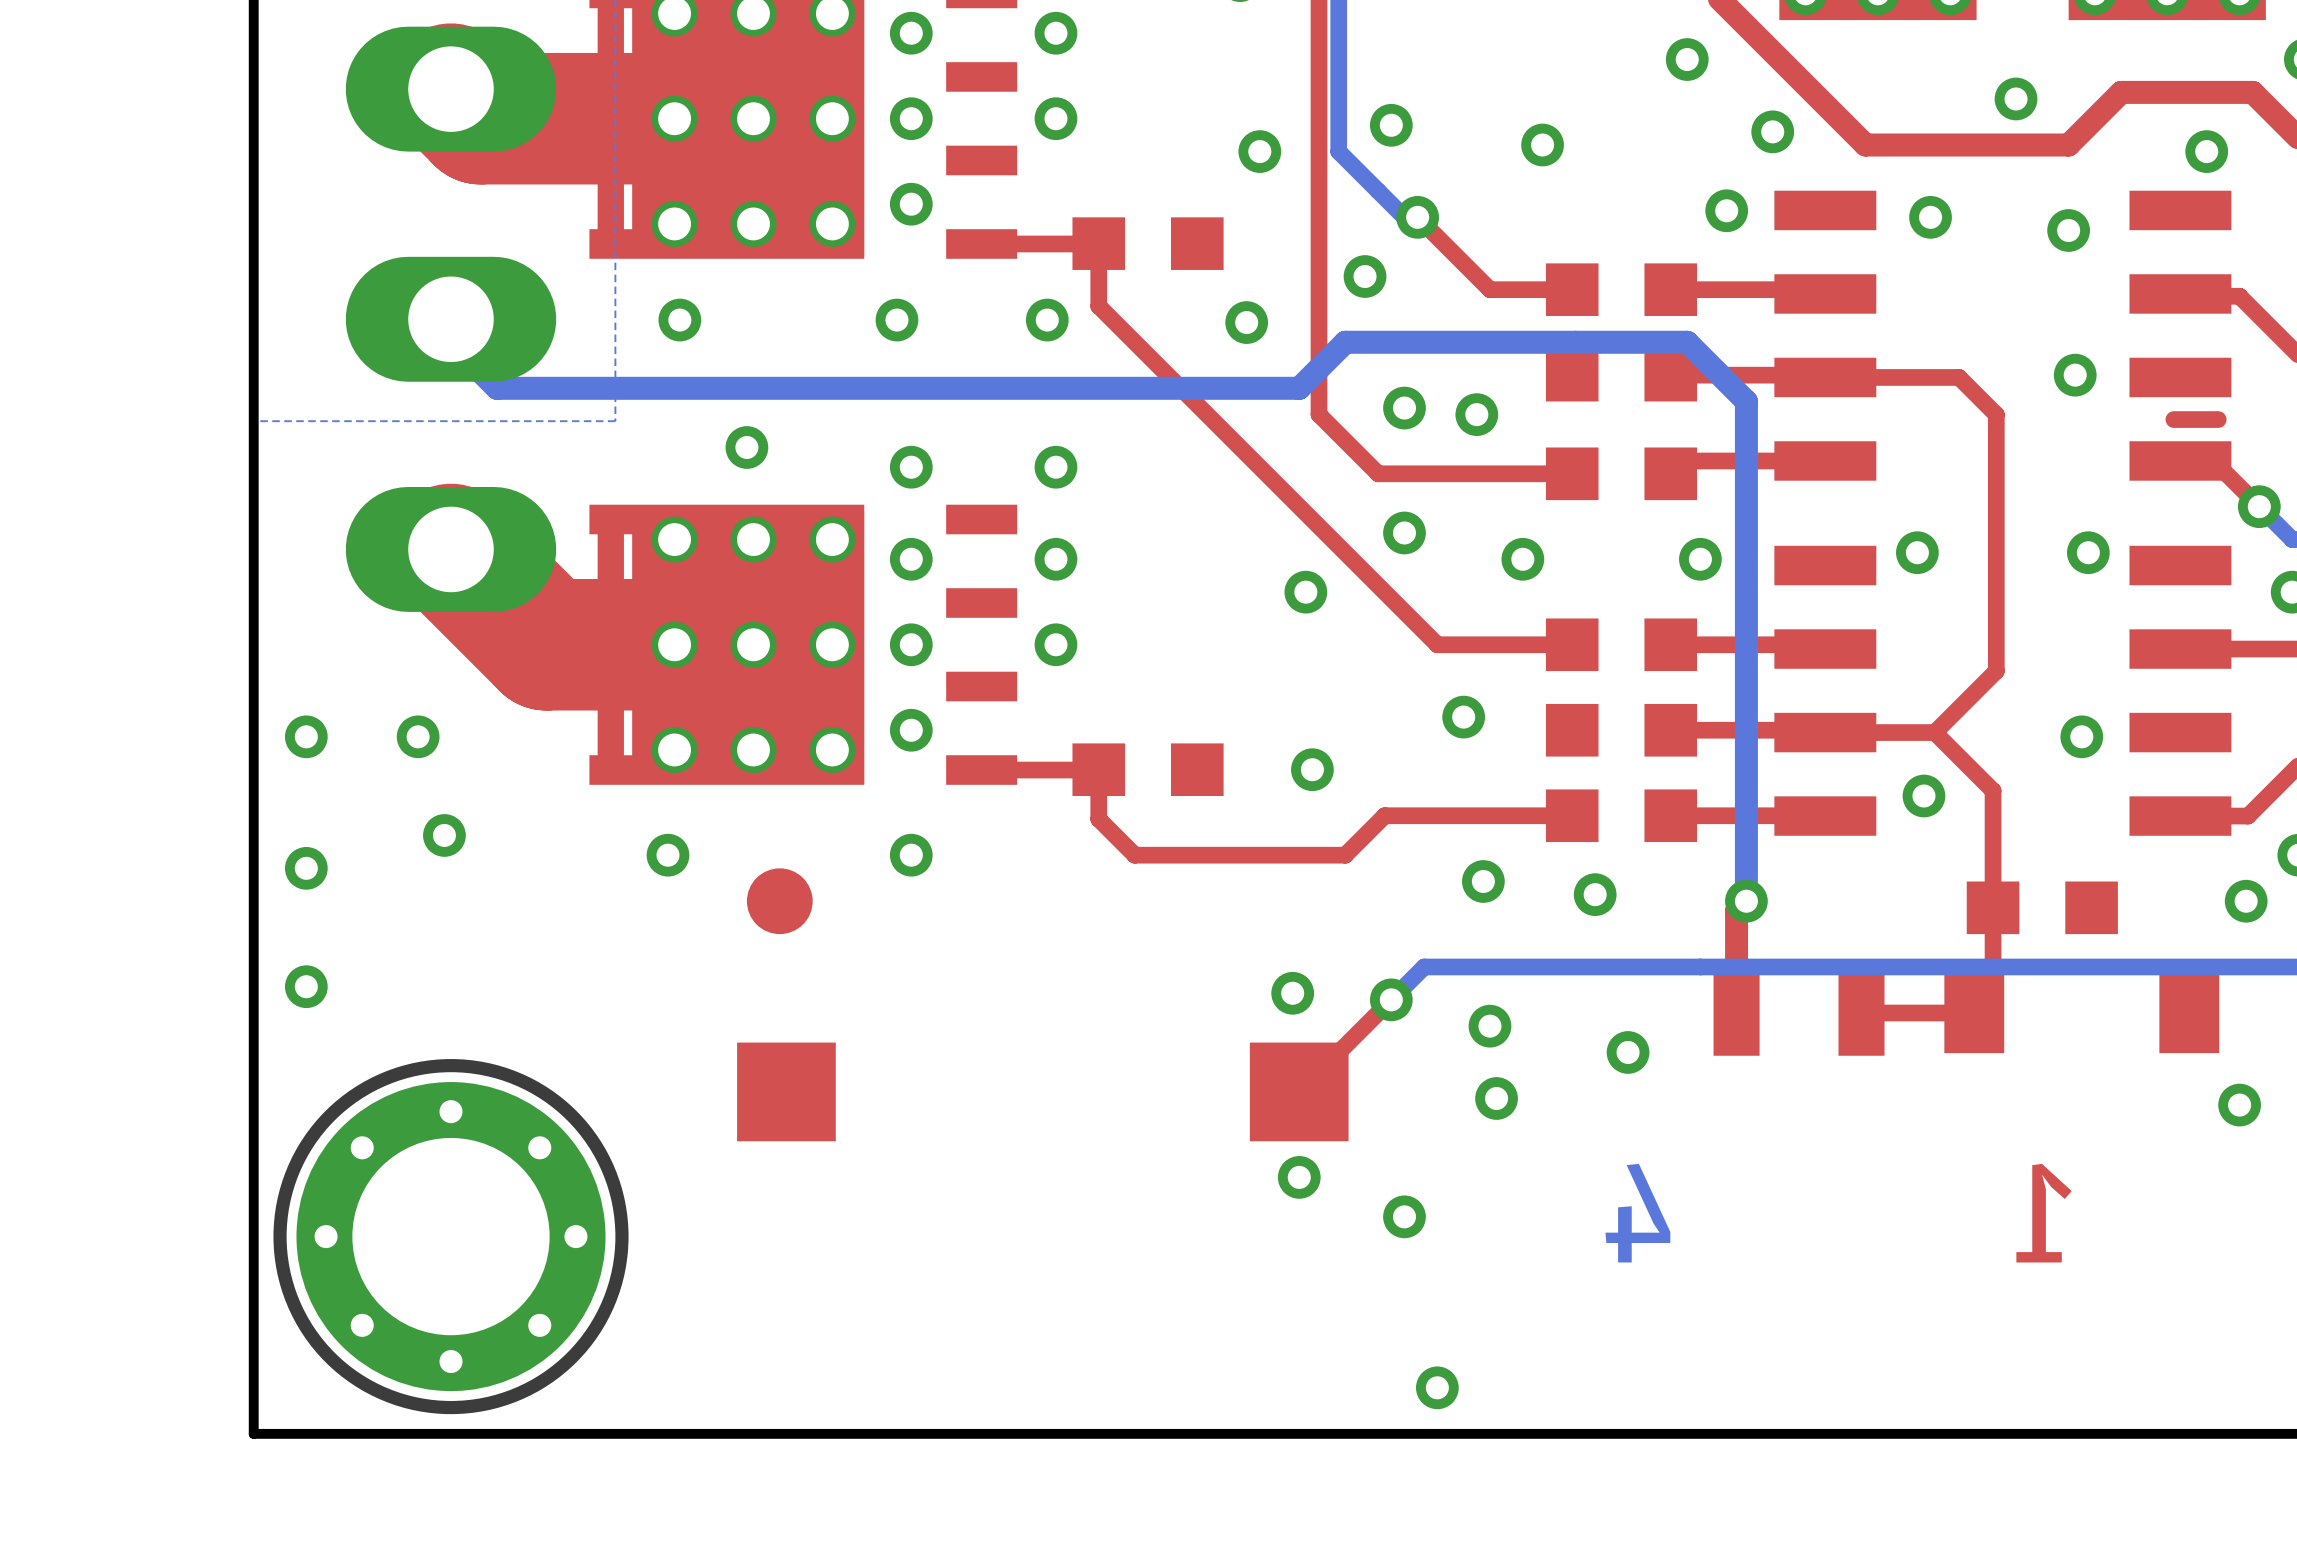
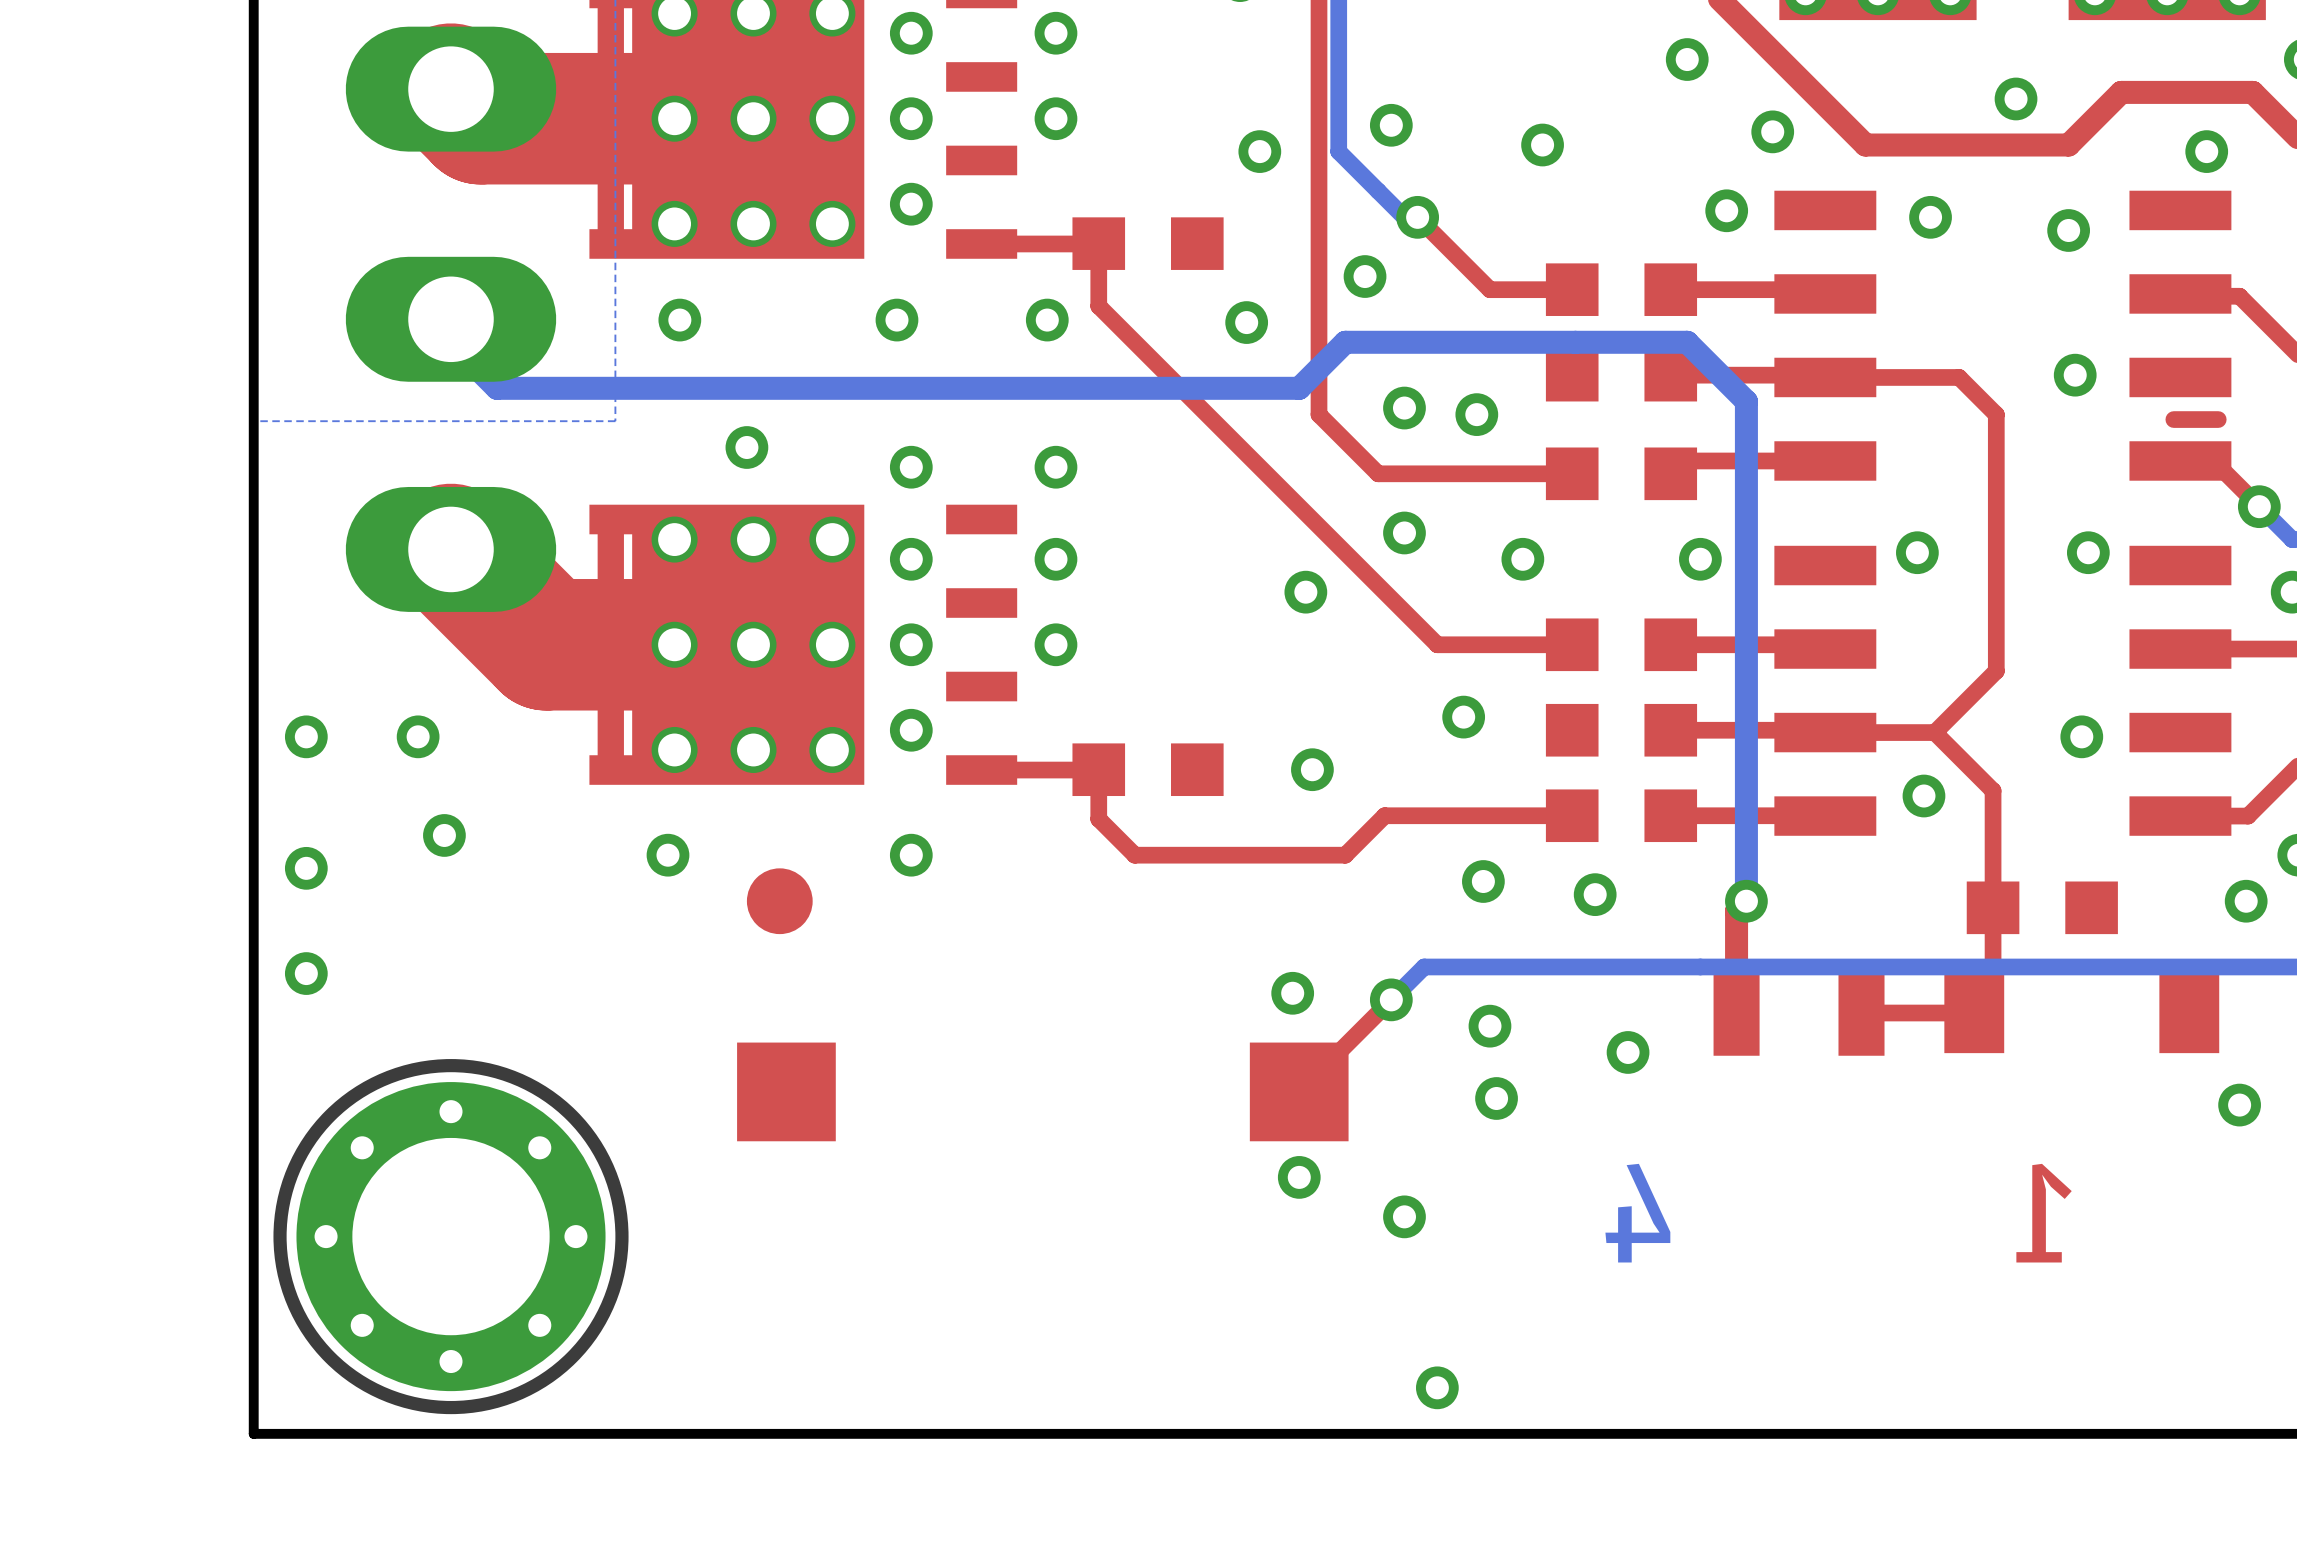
part position: (306, 986) -> (306, 973)

